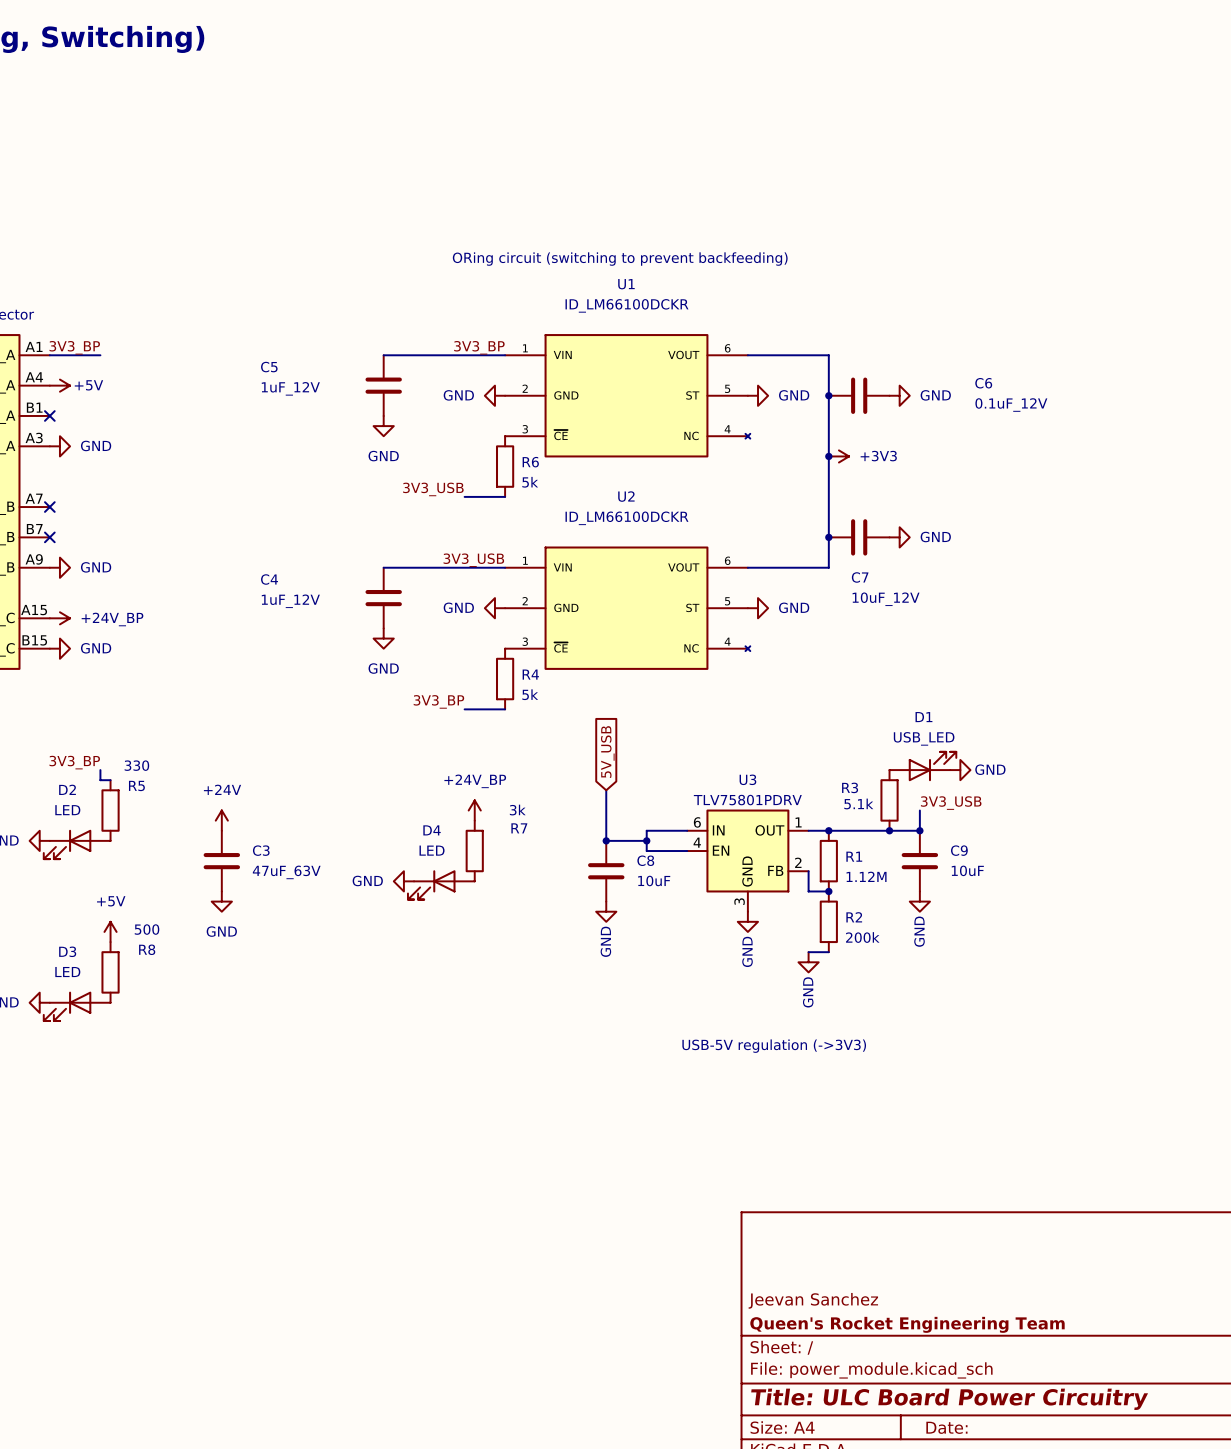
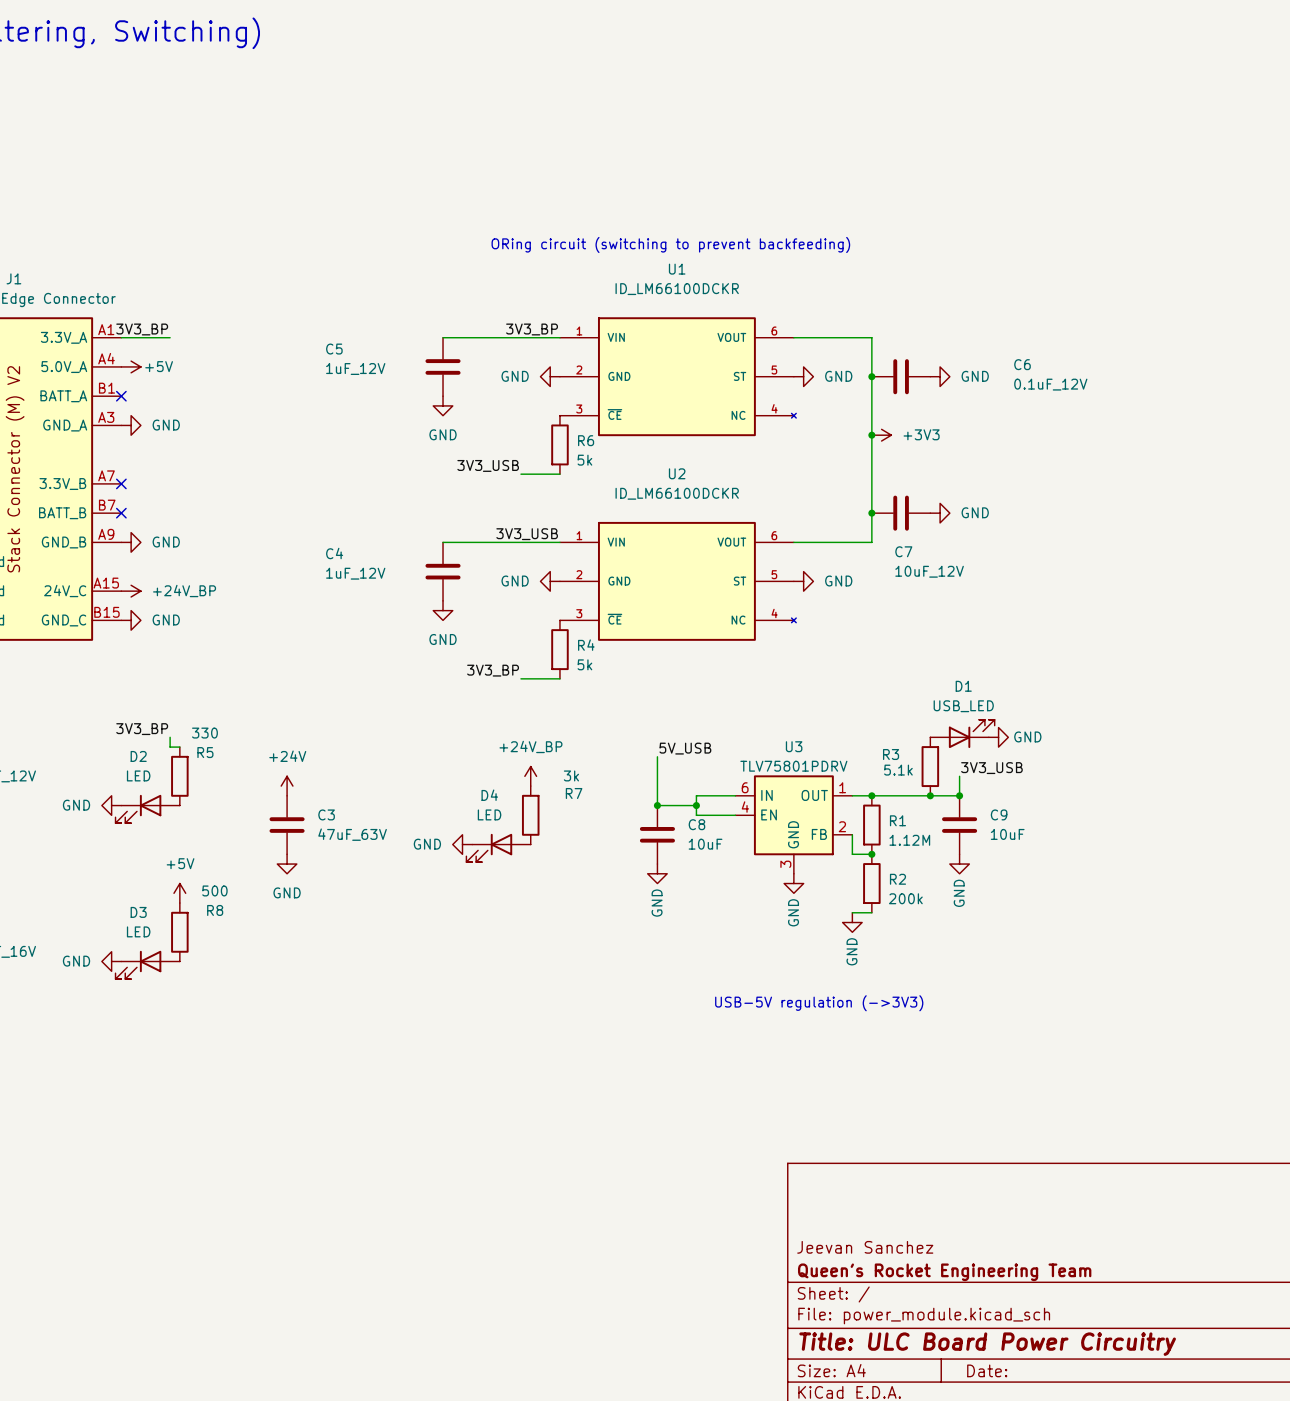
global label: 5V_USB (607, 752) -> none
label: none -> 5V_USB (685, 748)

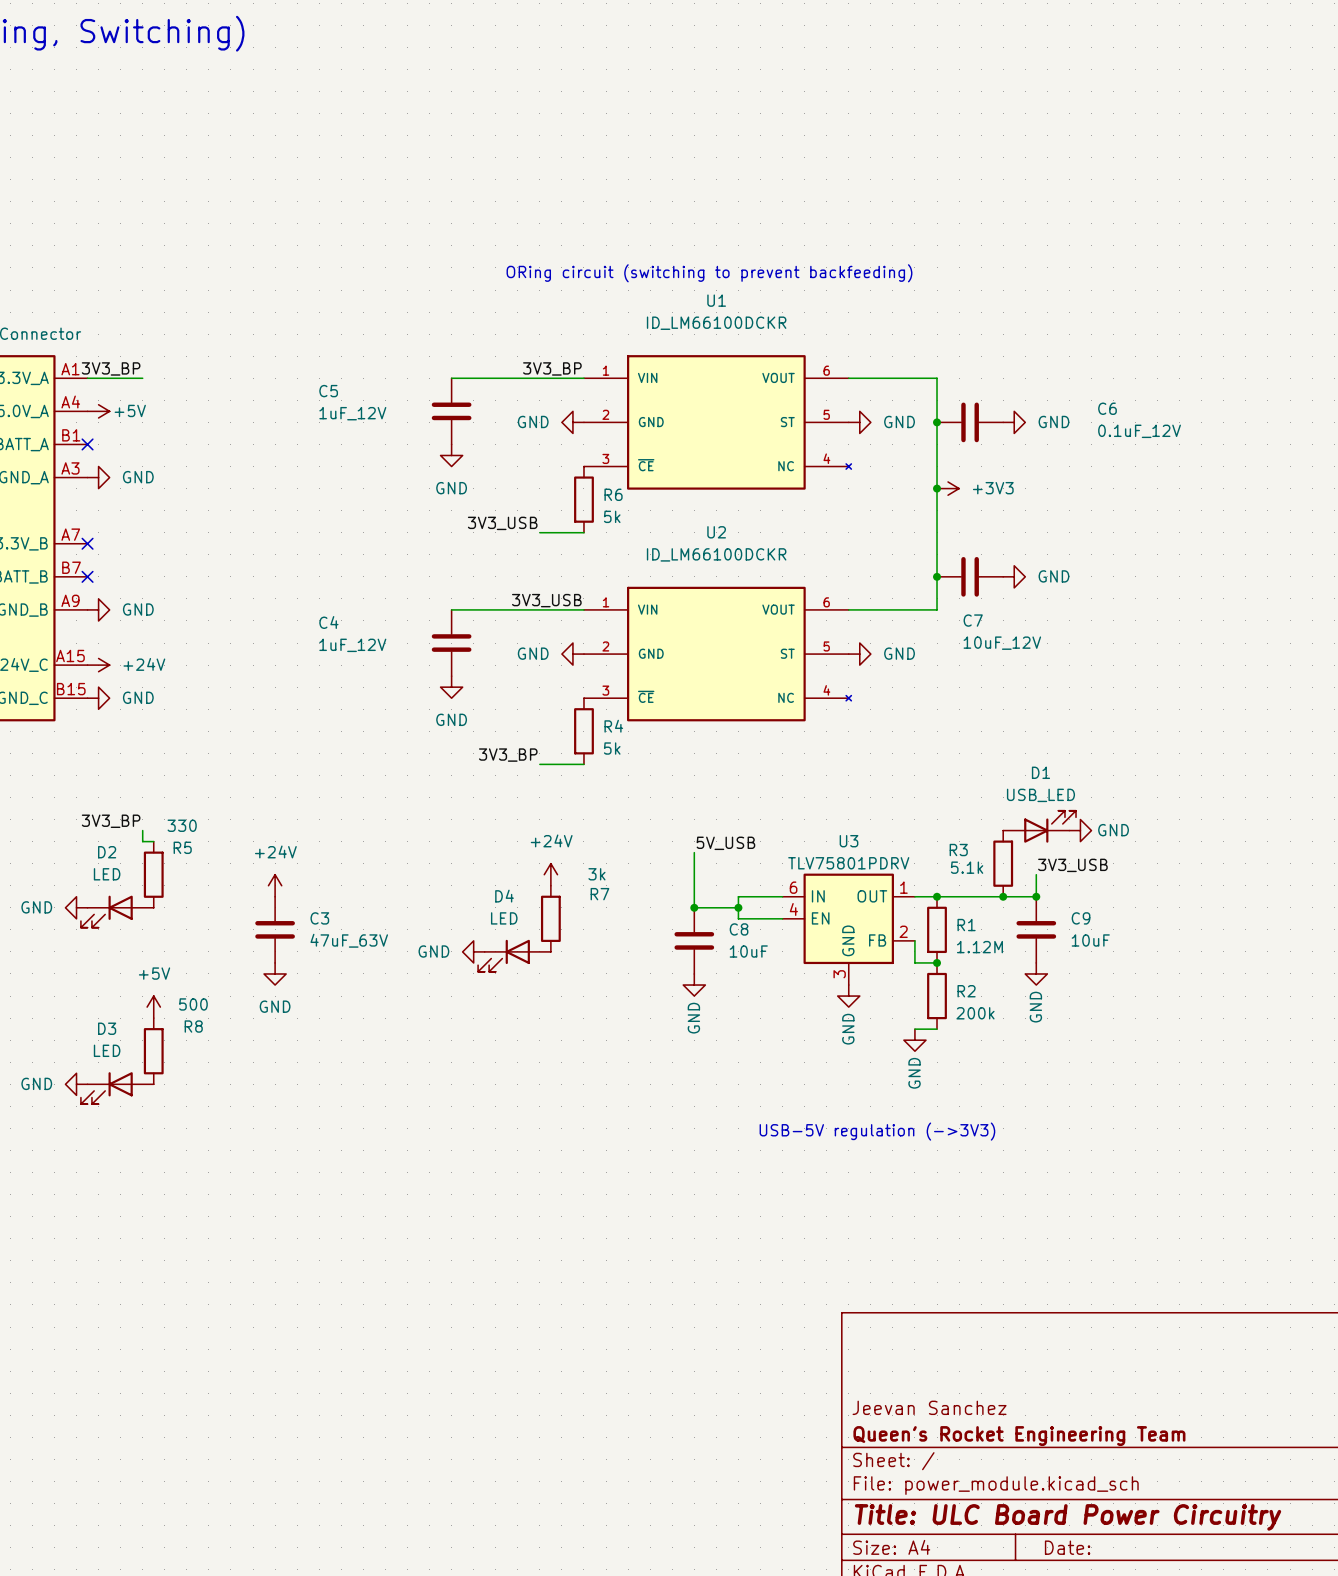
power symbol: +24V_BP (131, 591) -> +24V (98, 665)
power symbol: +24V_BP (530, 776) -> +24V (550, 874)

